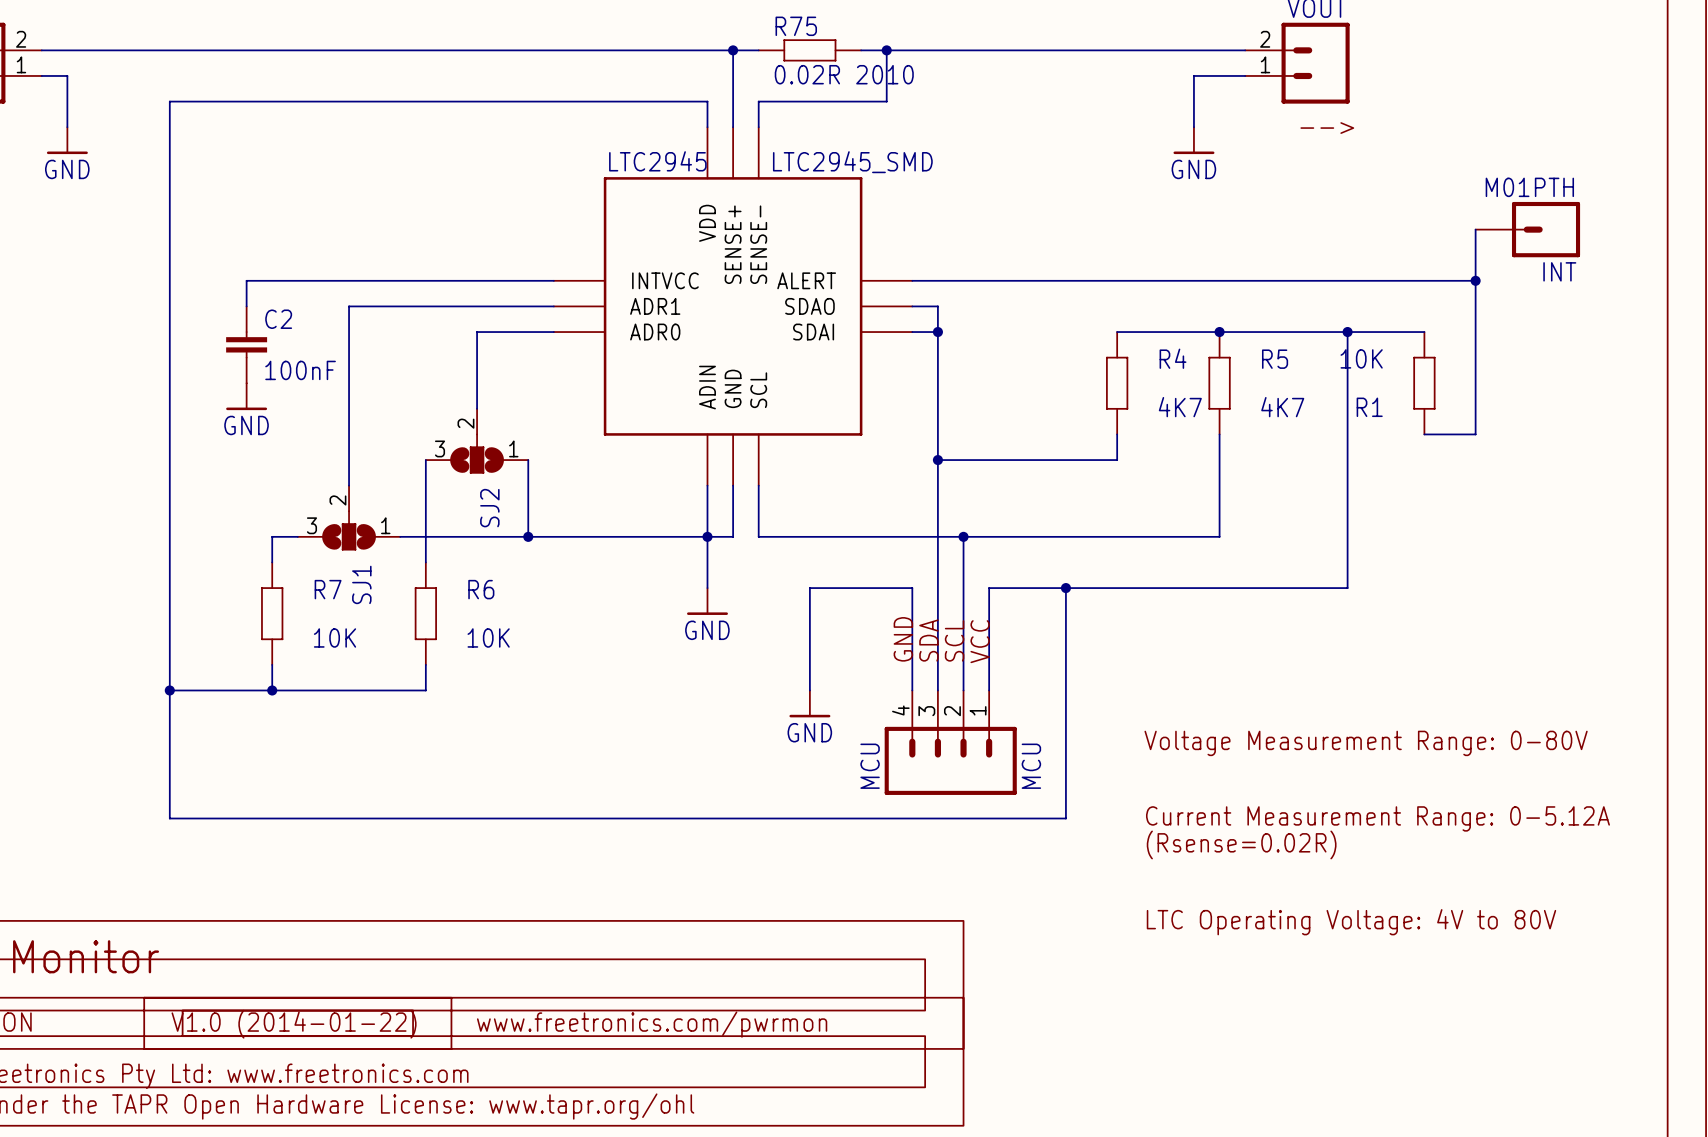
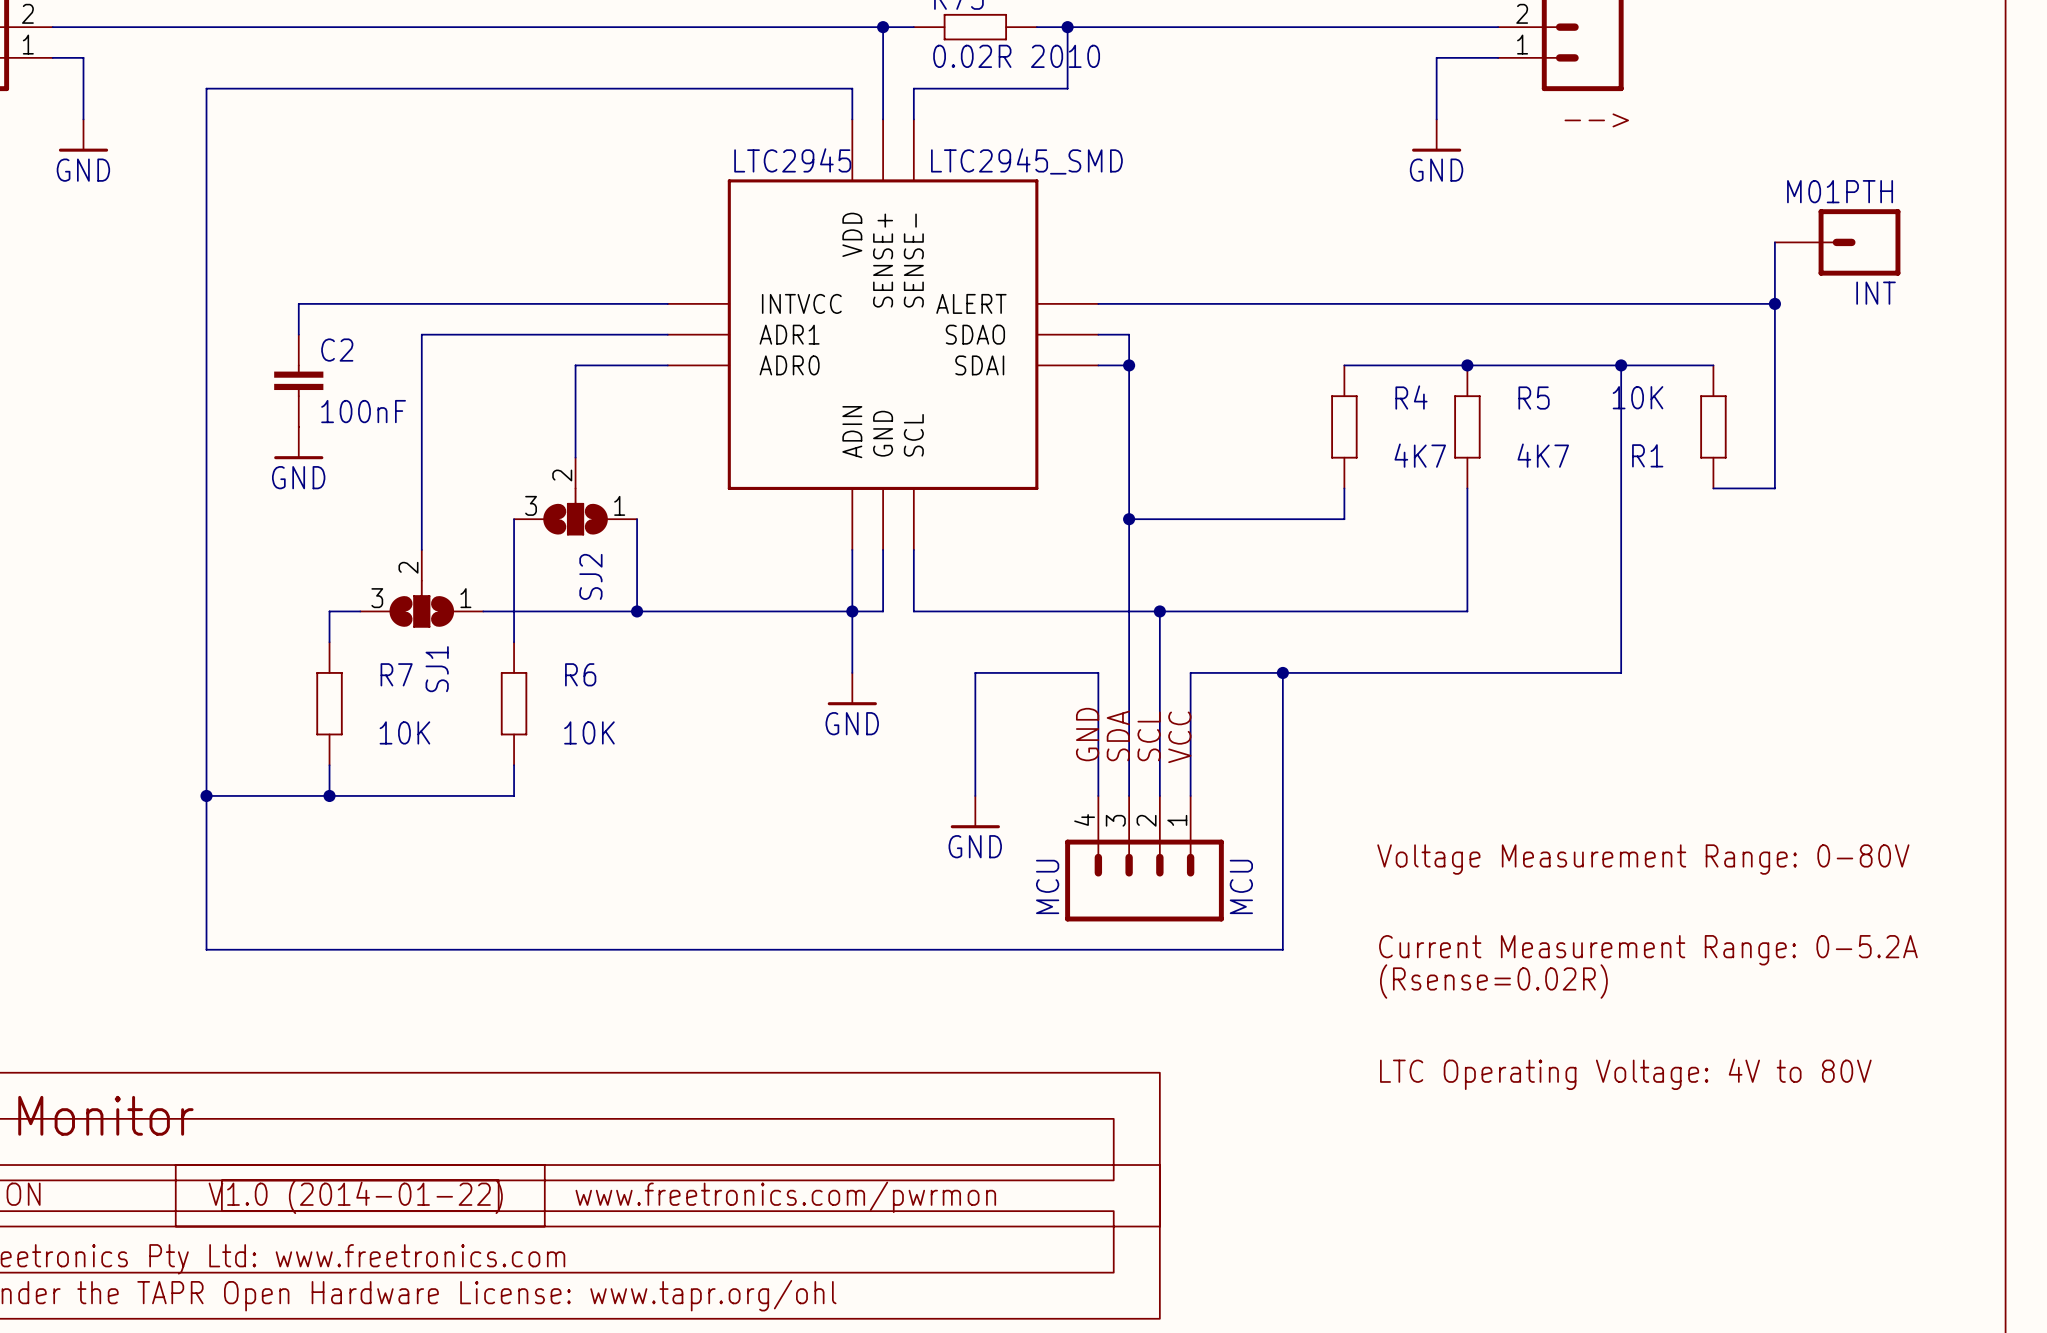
text: Current Measurement Range: 0-5.12A (1377, 818) -> Current Measurement Range: 0-5.2A (1648, 950)

